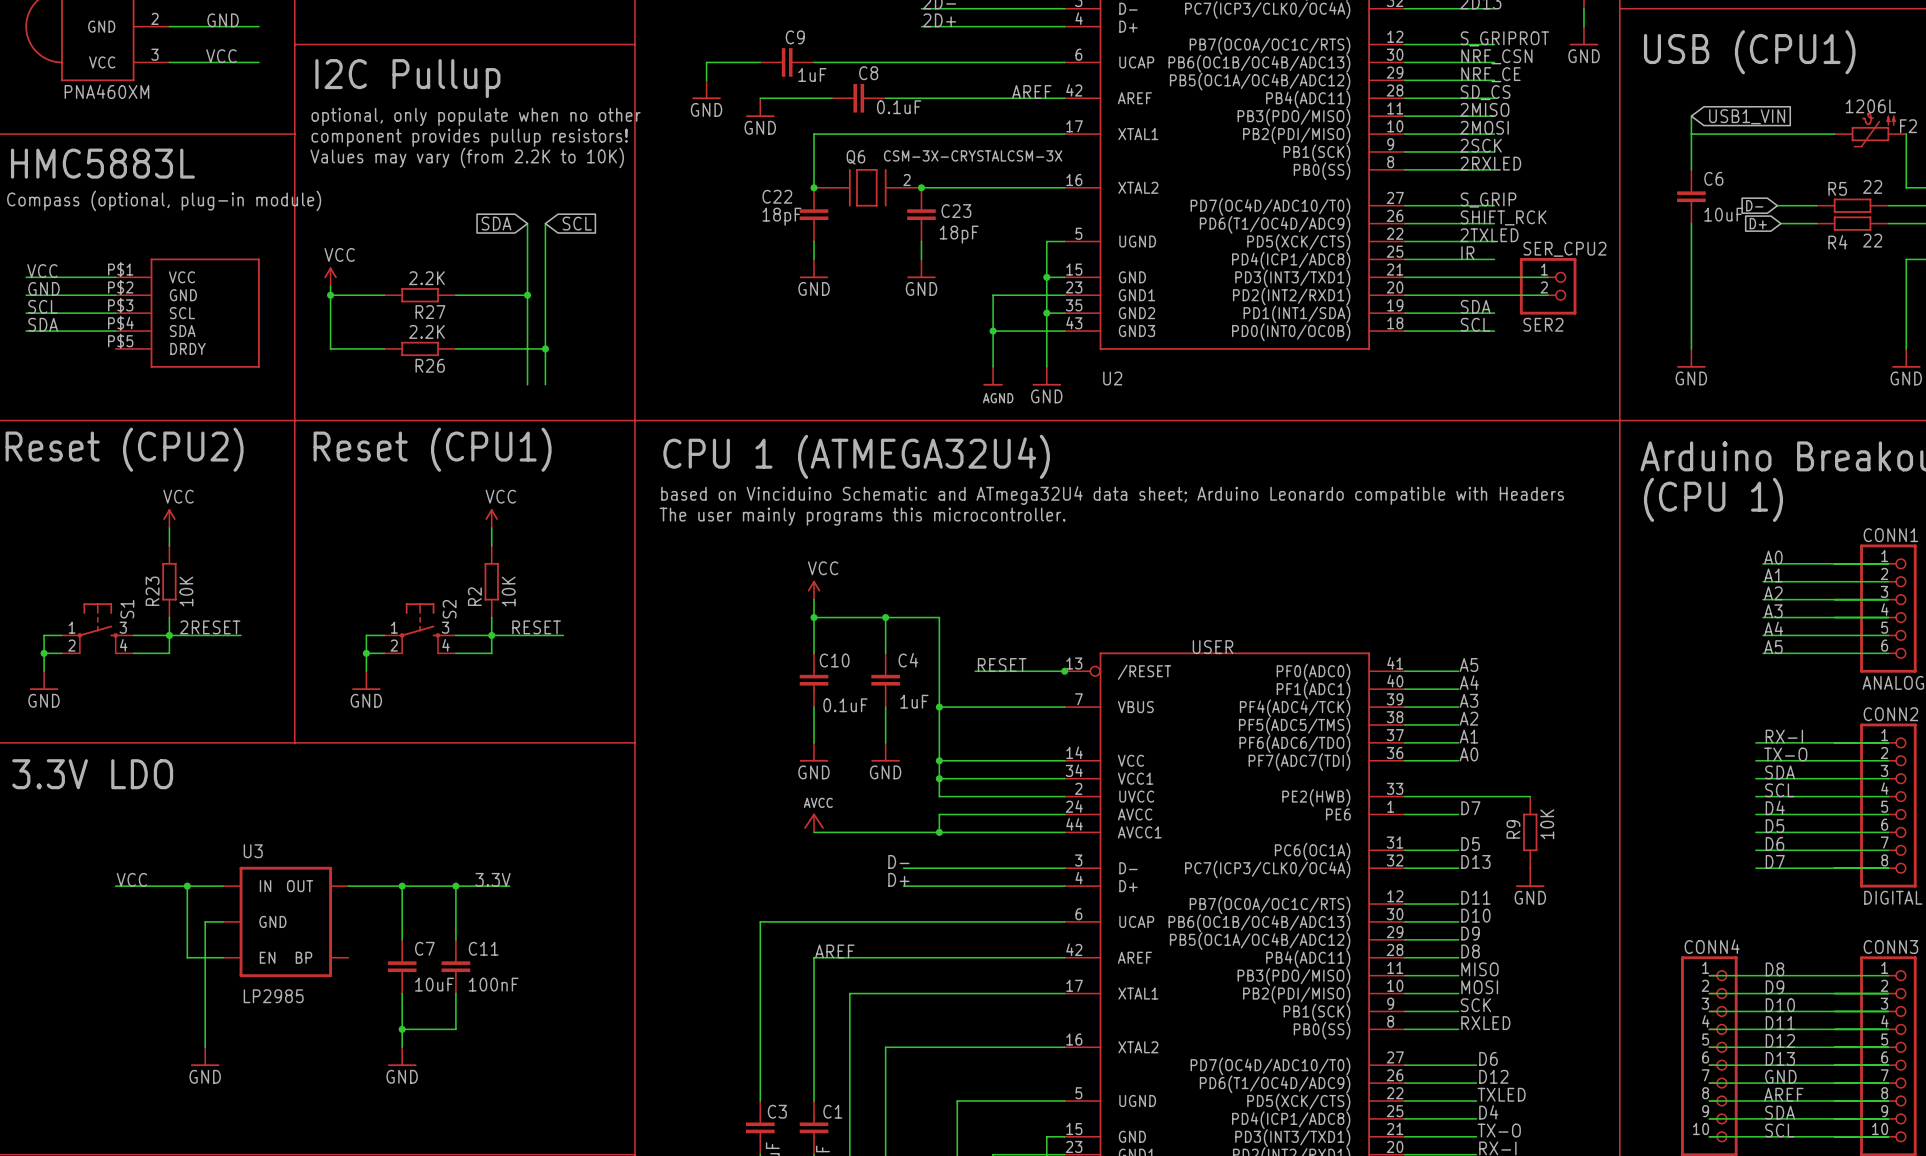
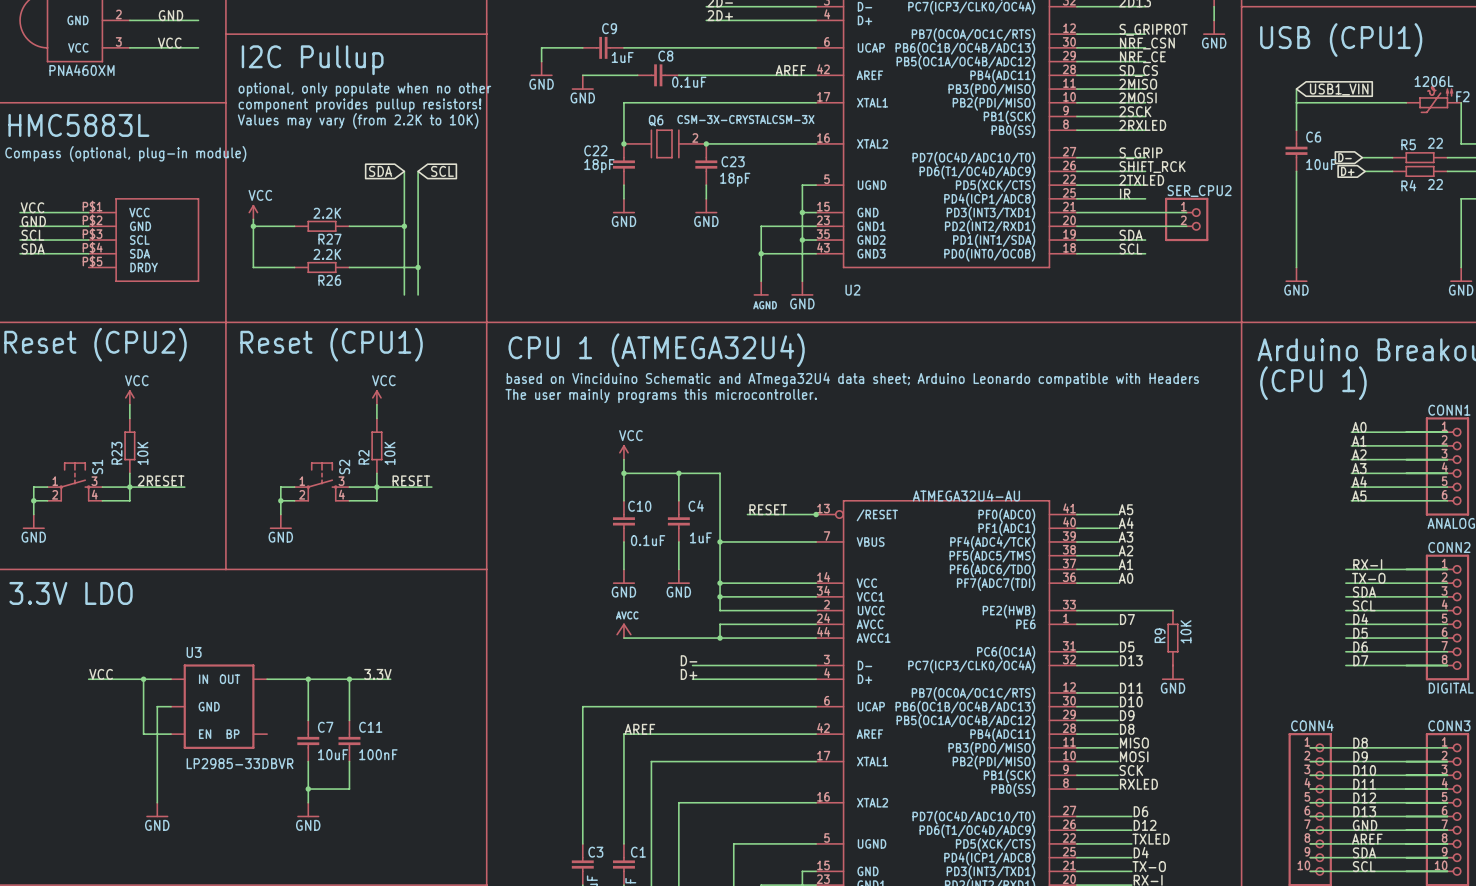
SER_CPU2 value: SER2 (1543, 324) -> none
part value: USER (1213, 647) -> ATMEGA32U4-AU (966, 495)
U3 value: LP2985 (273, 996) -> LP2985-33DBVR (240, 763)

